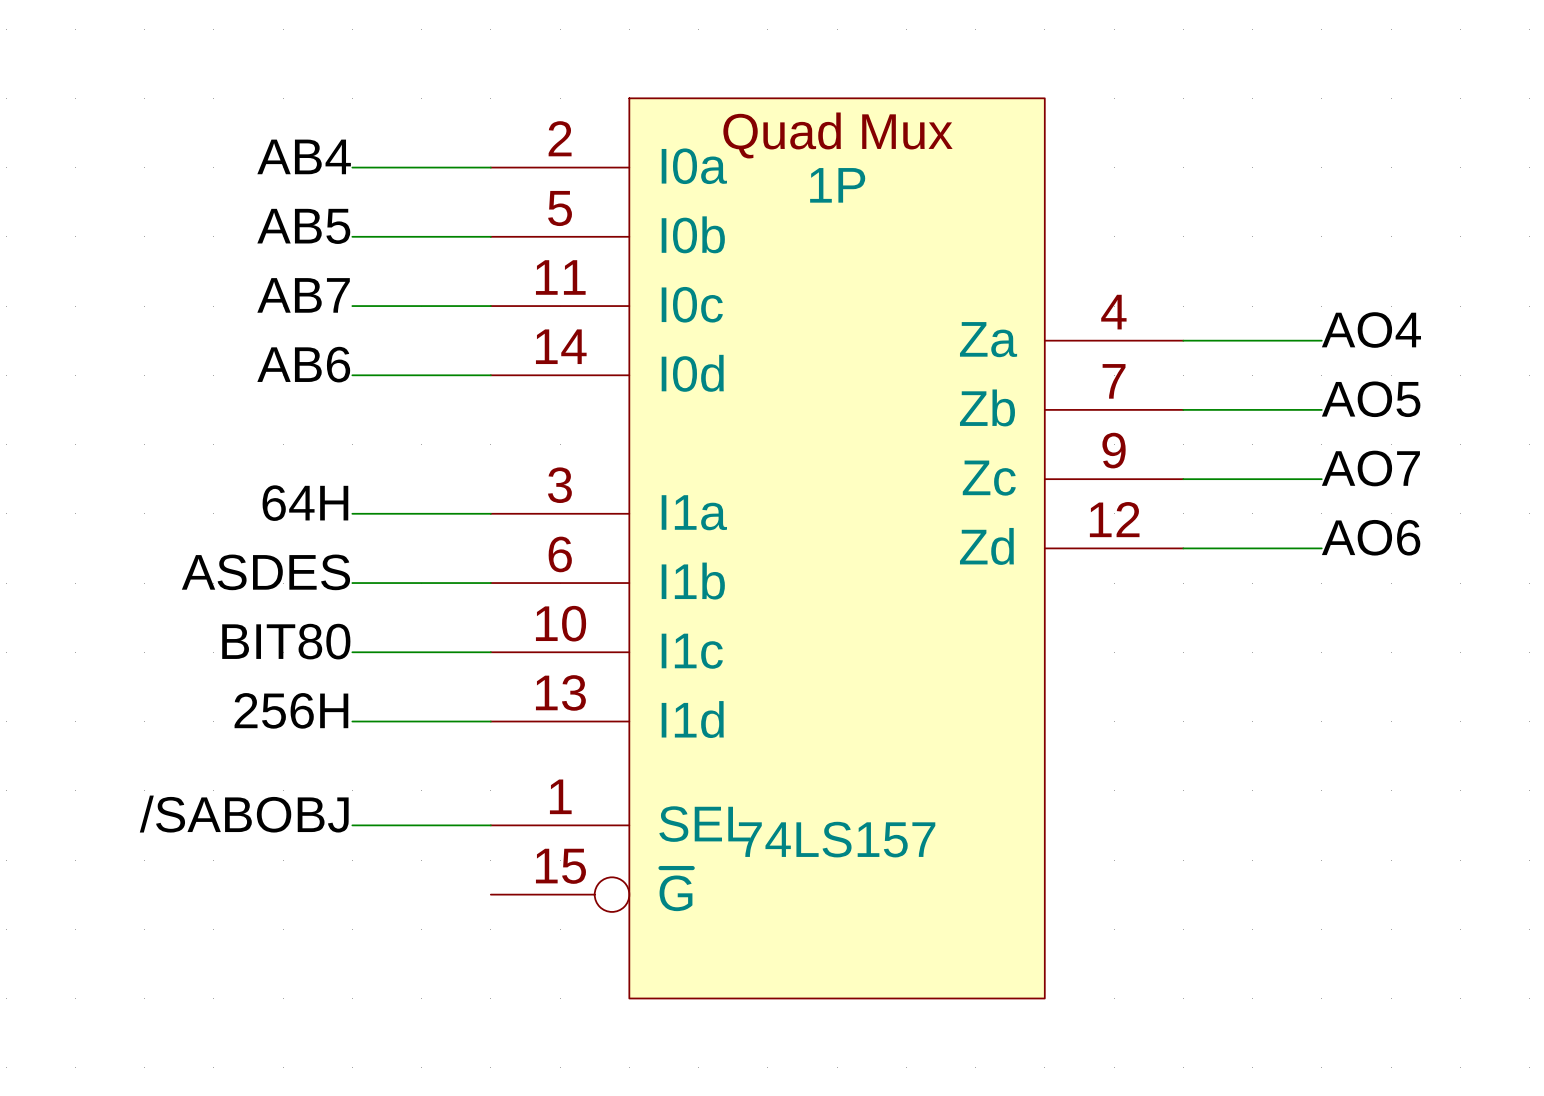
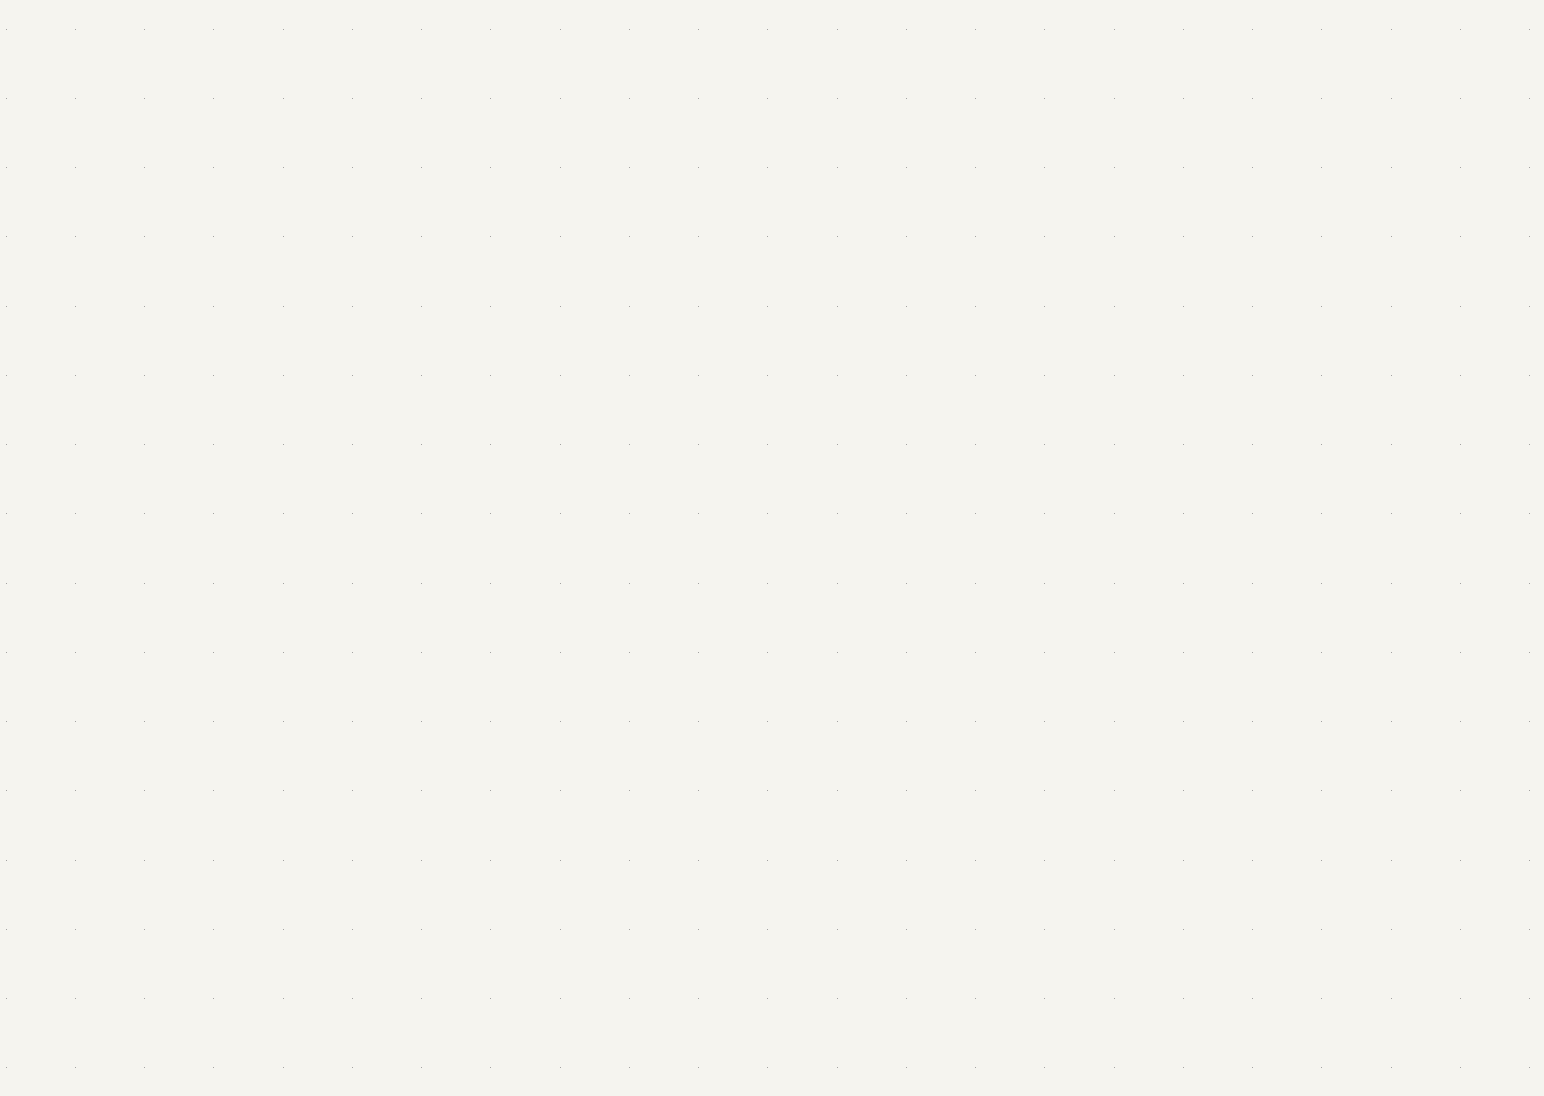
label: AB4 (304, 156) -> none
wire: (352, 167) (490, 167) -> none
label: AB5 (303, 226) -> none
wire: (352, 236) (490, 236) -> none
label: AB7 (303, 295) -> none
wire: (352, 306) (490, 306) -> none
label: AO4 (1371, 330) -> none
wire: (1183, 340) (1321, 340) -> none
label: AB6 (303, 364) -> none
wire: (352, 375) (490, 375) -> none
label: AO5 (1371, 399) -> none
wire: (1183, 409) (1321, 409) -> none
label: AO7 (1370, 468) -> none
wire: (1183, 479) (1321, 479) -> none
label: 64H (305, 503) -> none
wire: (352, 513) (490, 513) -> none
label: AO6 (1371, 537) -> none
1P: 74LS157 (837, 548) -> none
wire: (1183, 548) (1321, 548) -> none
label: ASDES (265, 572) -> none
wire: (352, 583) (490, 583) -> none
label: BIT80 (286, 641) -> none
wire: (352, 652) (490, 652) -> none
label: 256H (291, 710) -> none
wire: (352, 721) (490, 721) -> none
label: /SABOBJ (244, 814) -> none
wire: (352, 825) (490, 825) -> none

